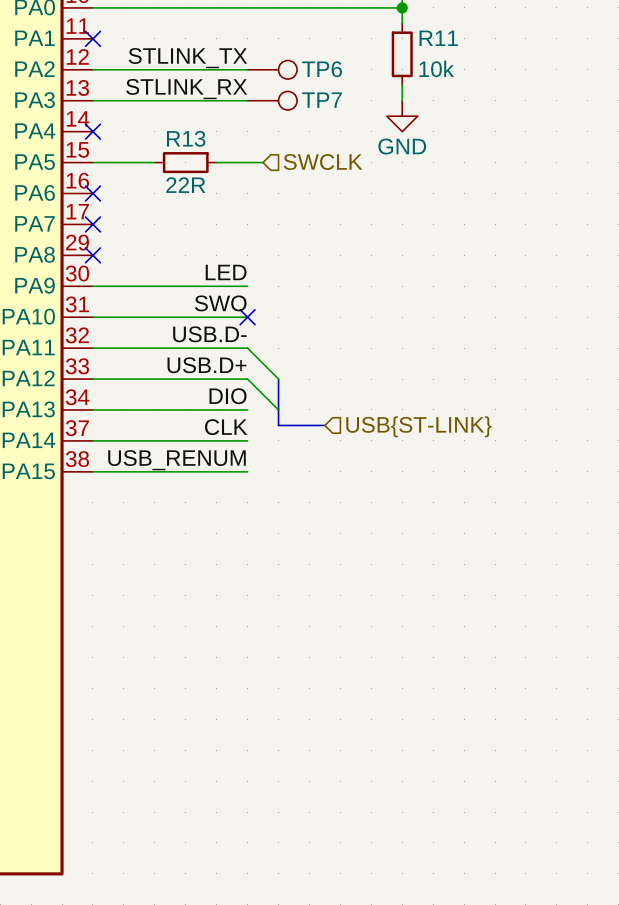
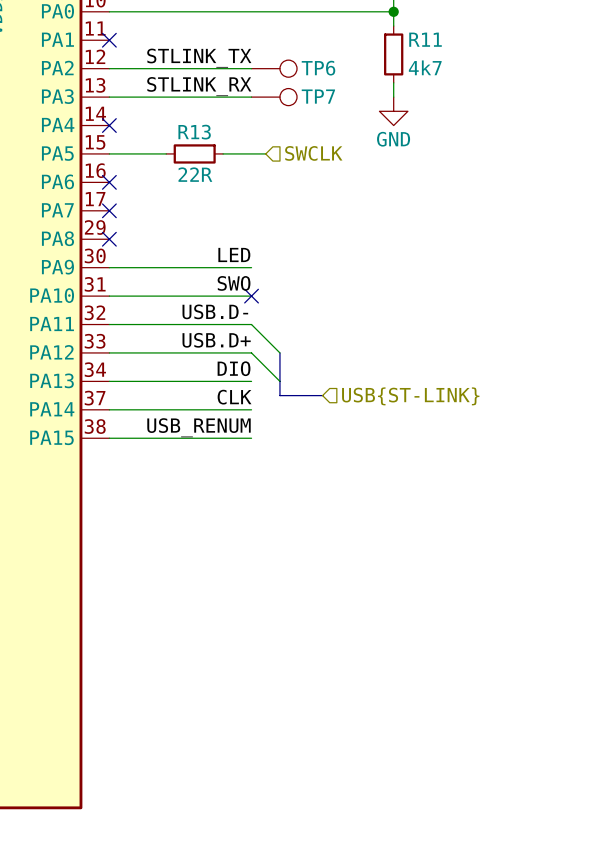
R11 value: 10k (436, 68) -> 4k7 (425, 67)

